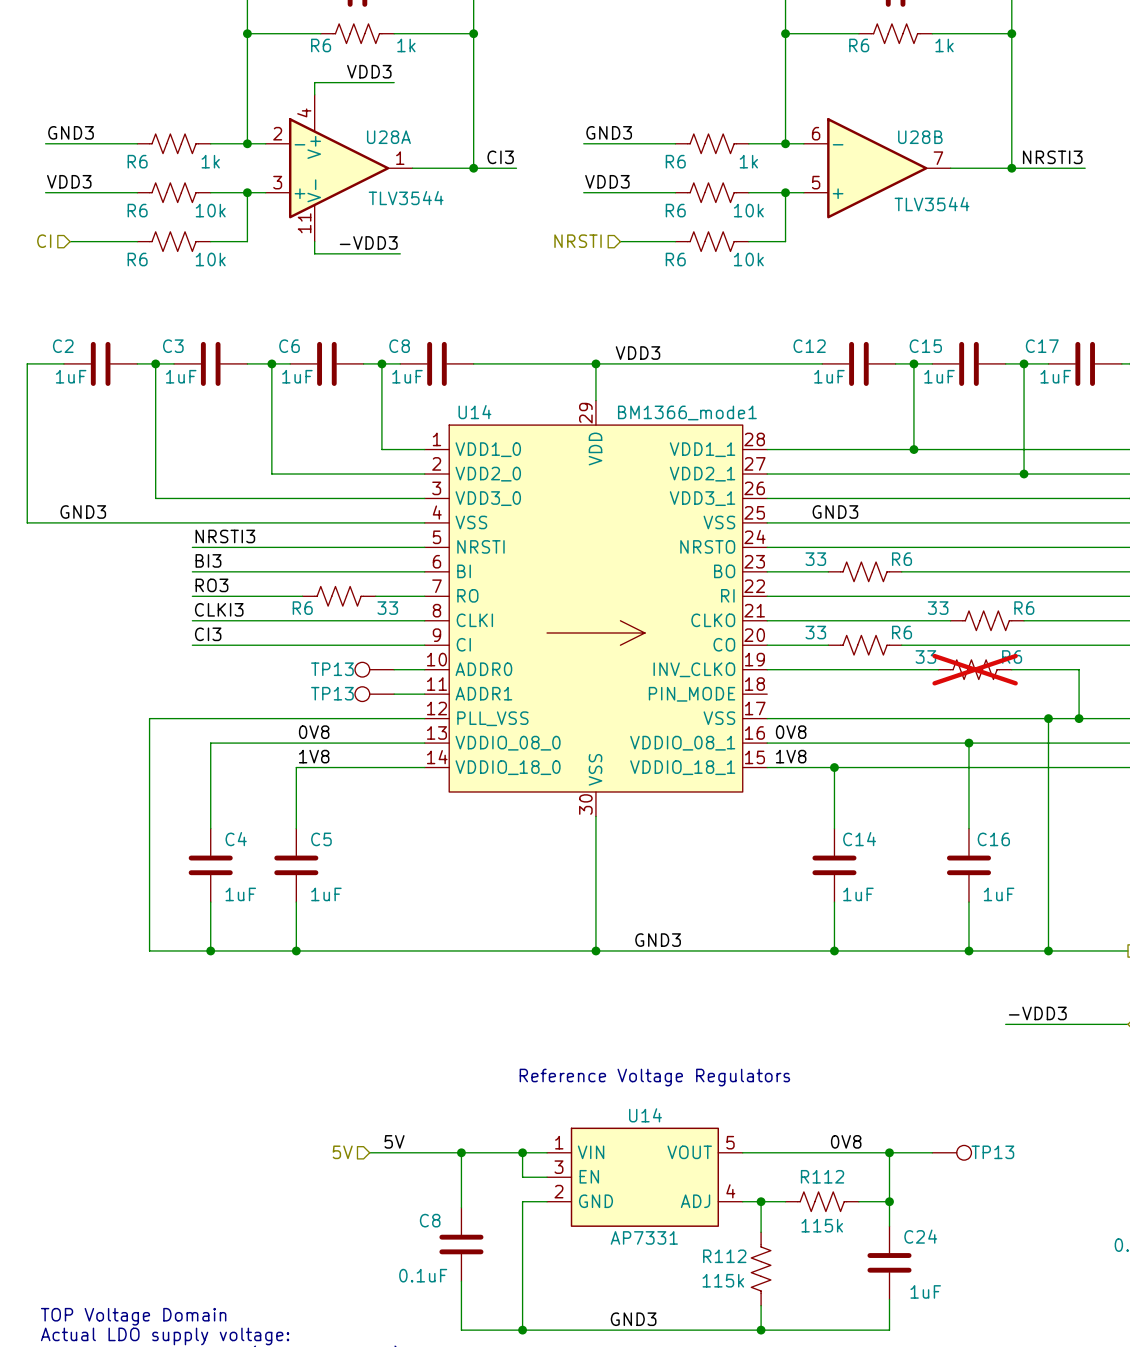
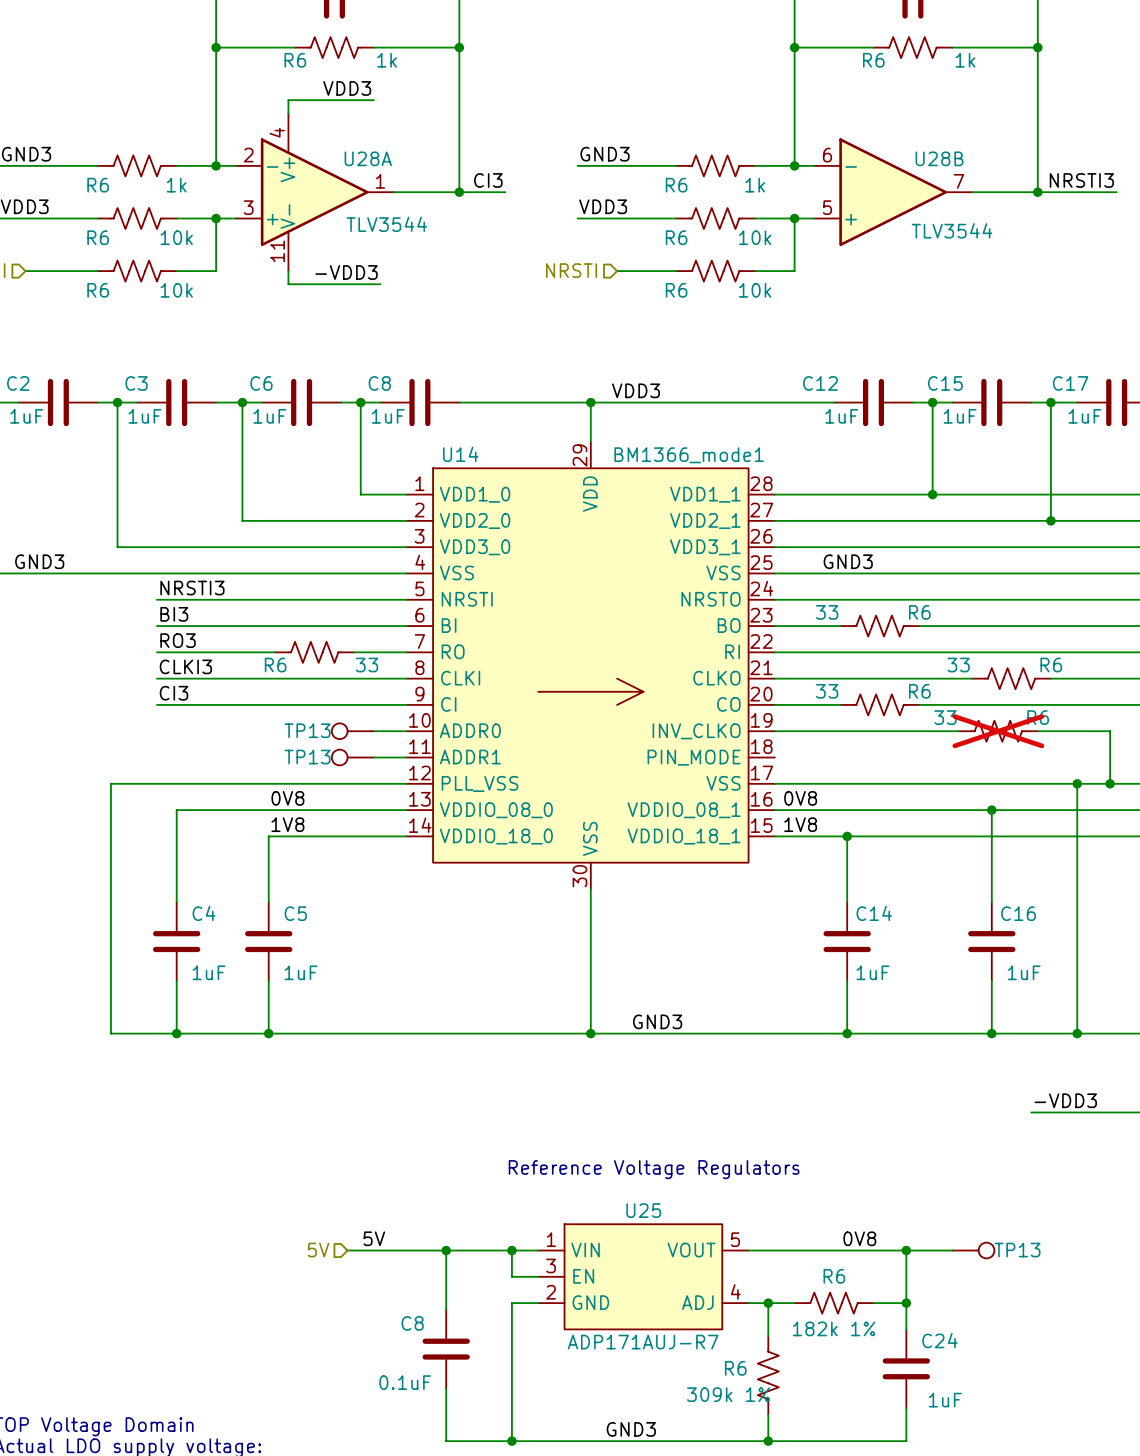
U14 name: U14 (645, 1115) -> U25 (643, 1210)
R112 name: R112 (822, 1176) -> R6 (834, 1276)
R112 value: 115k (822, 1225) -> 182k 1% (834, 1328)
U14 value: AP7331 (644, 1237) -> ADP171AUJ-R7 (643, 1342)
R112 name: R112 (724, 1256) -> R6 (735, 1368)
R112 value: 115k (723, 1280) -> 309k 1% (728, 1394)

